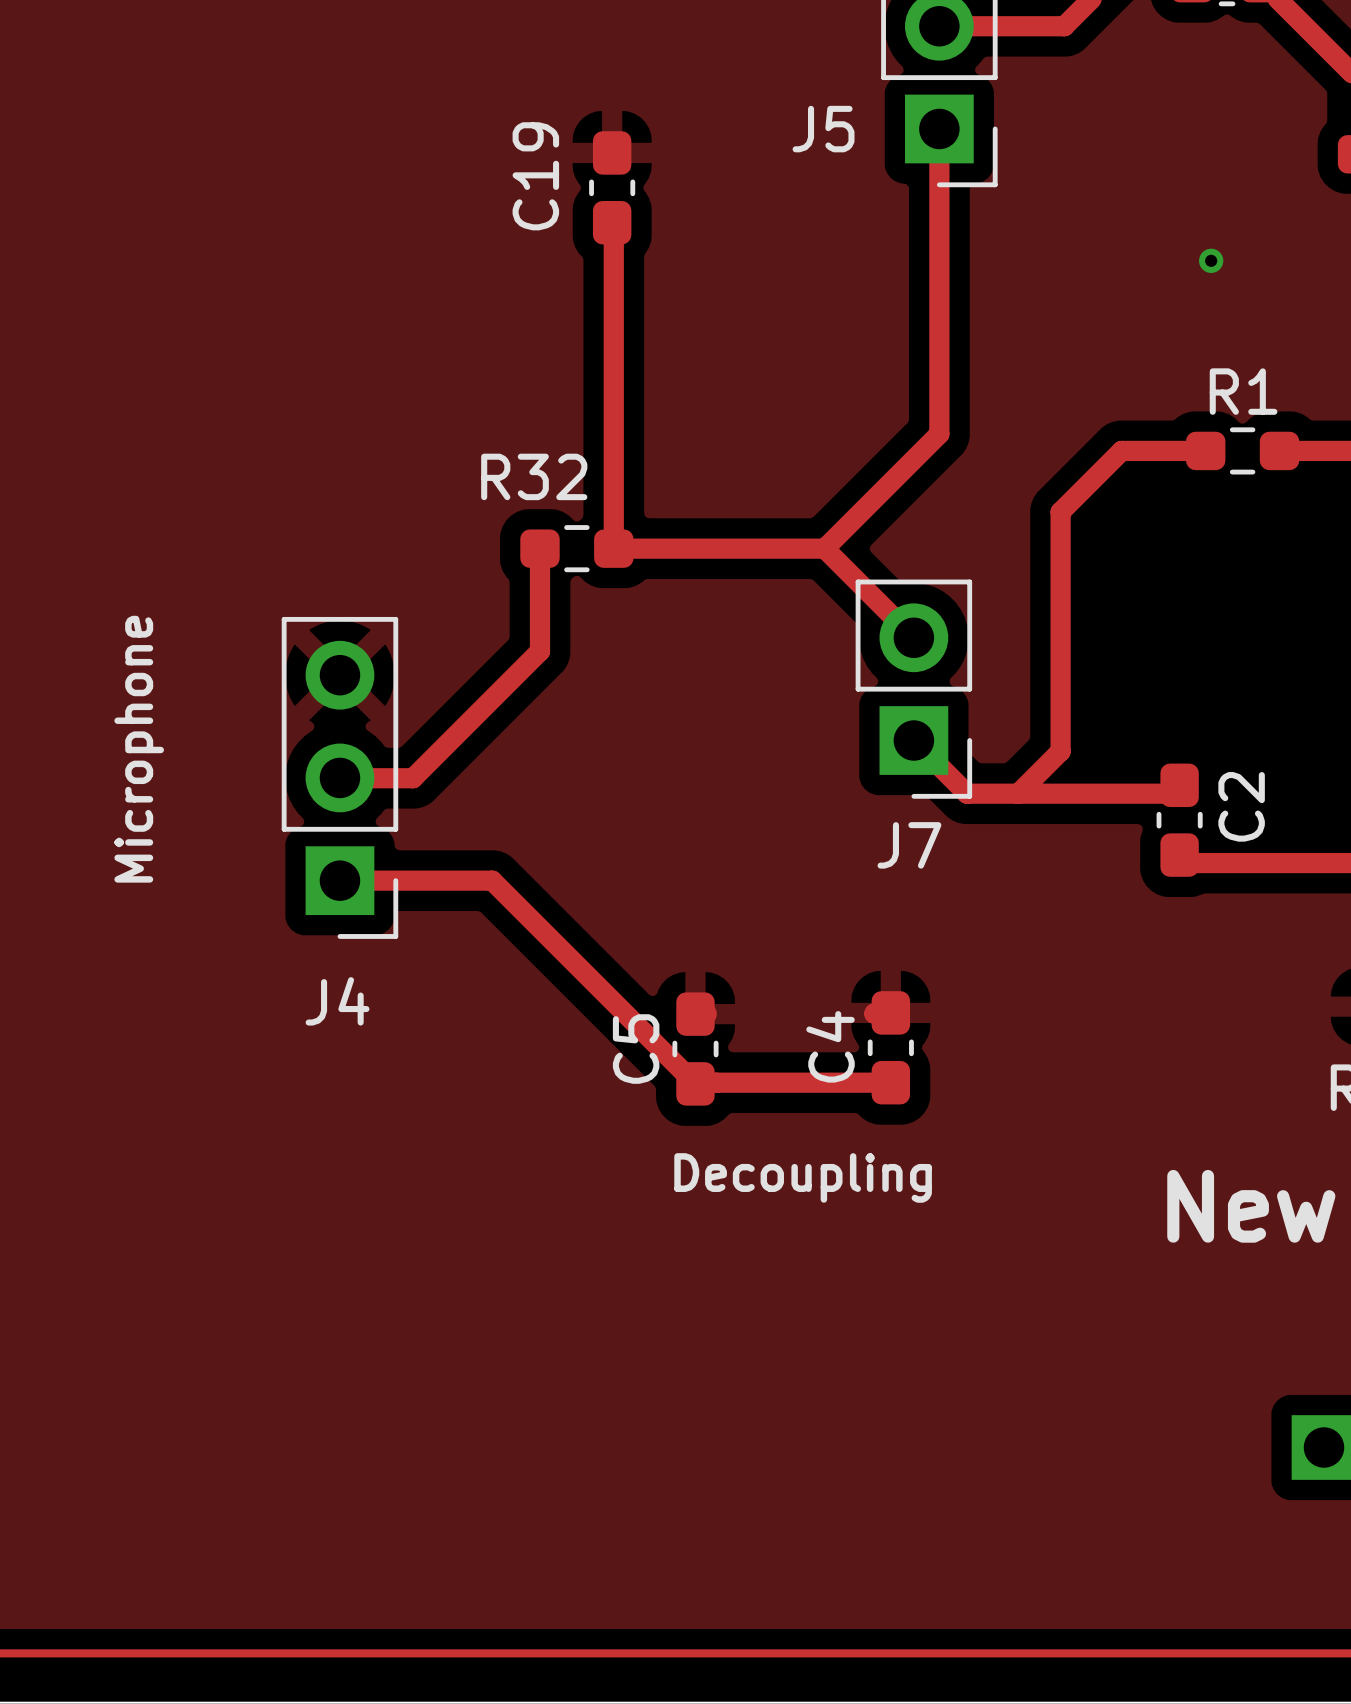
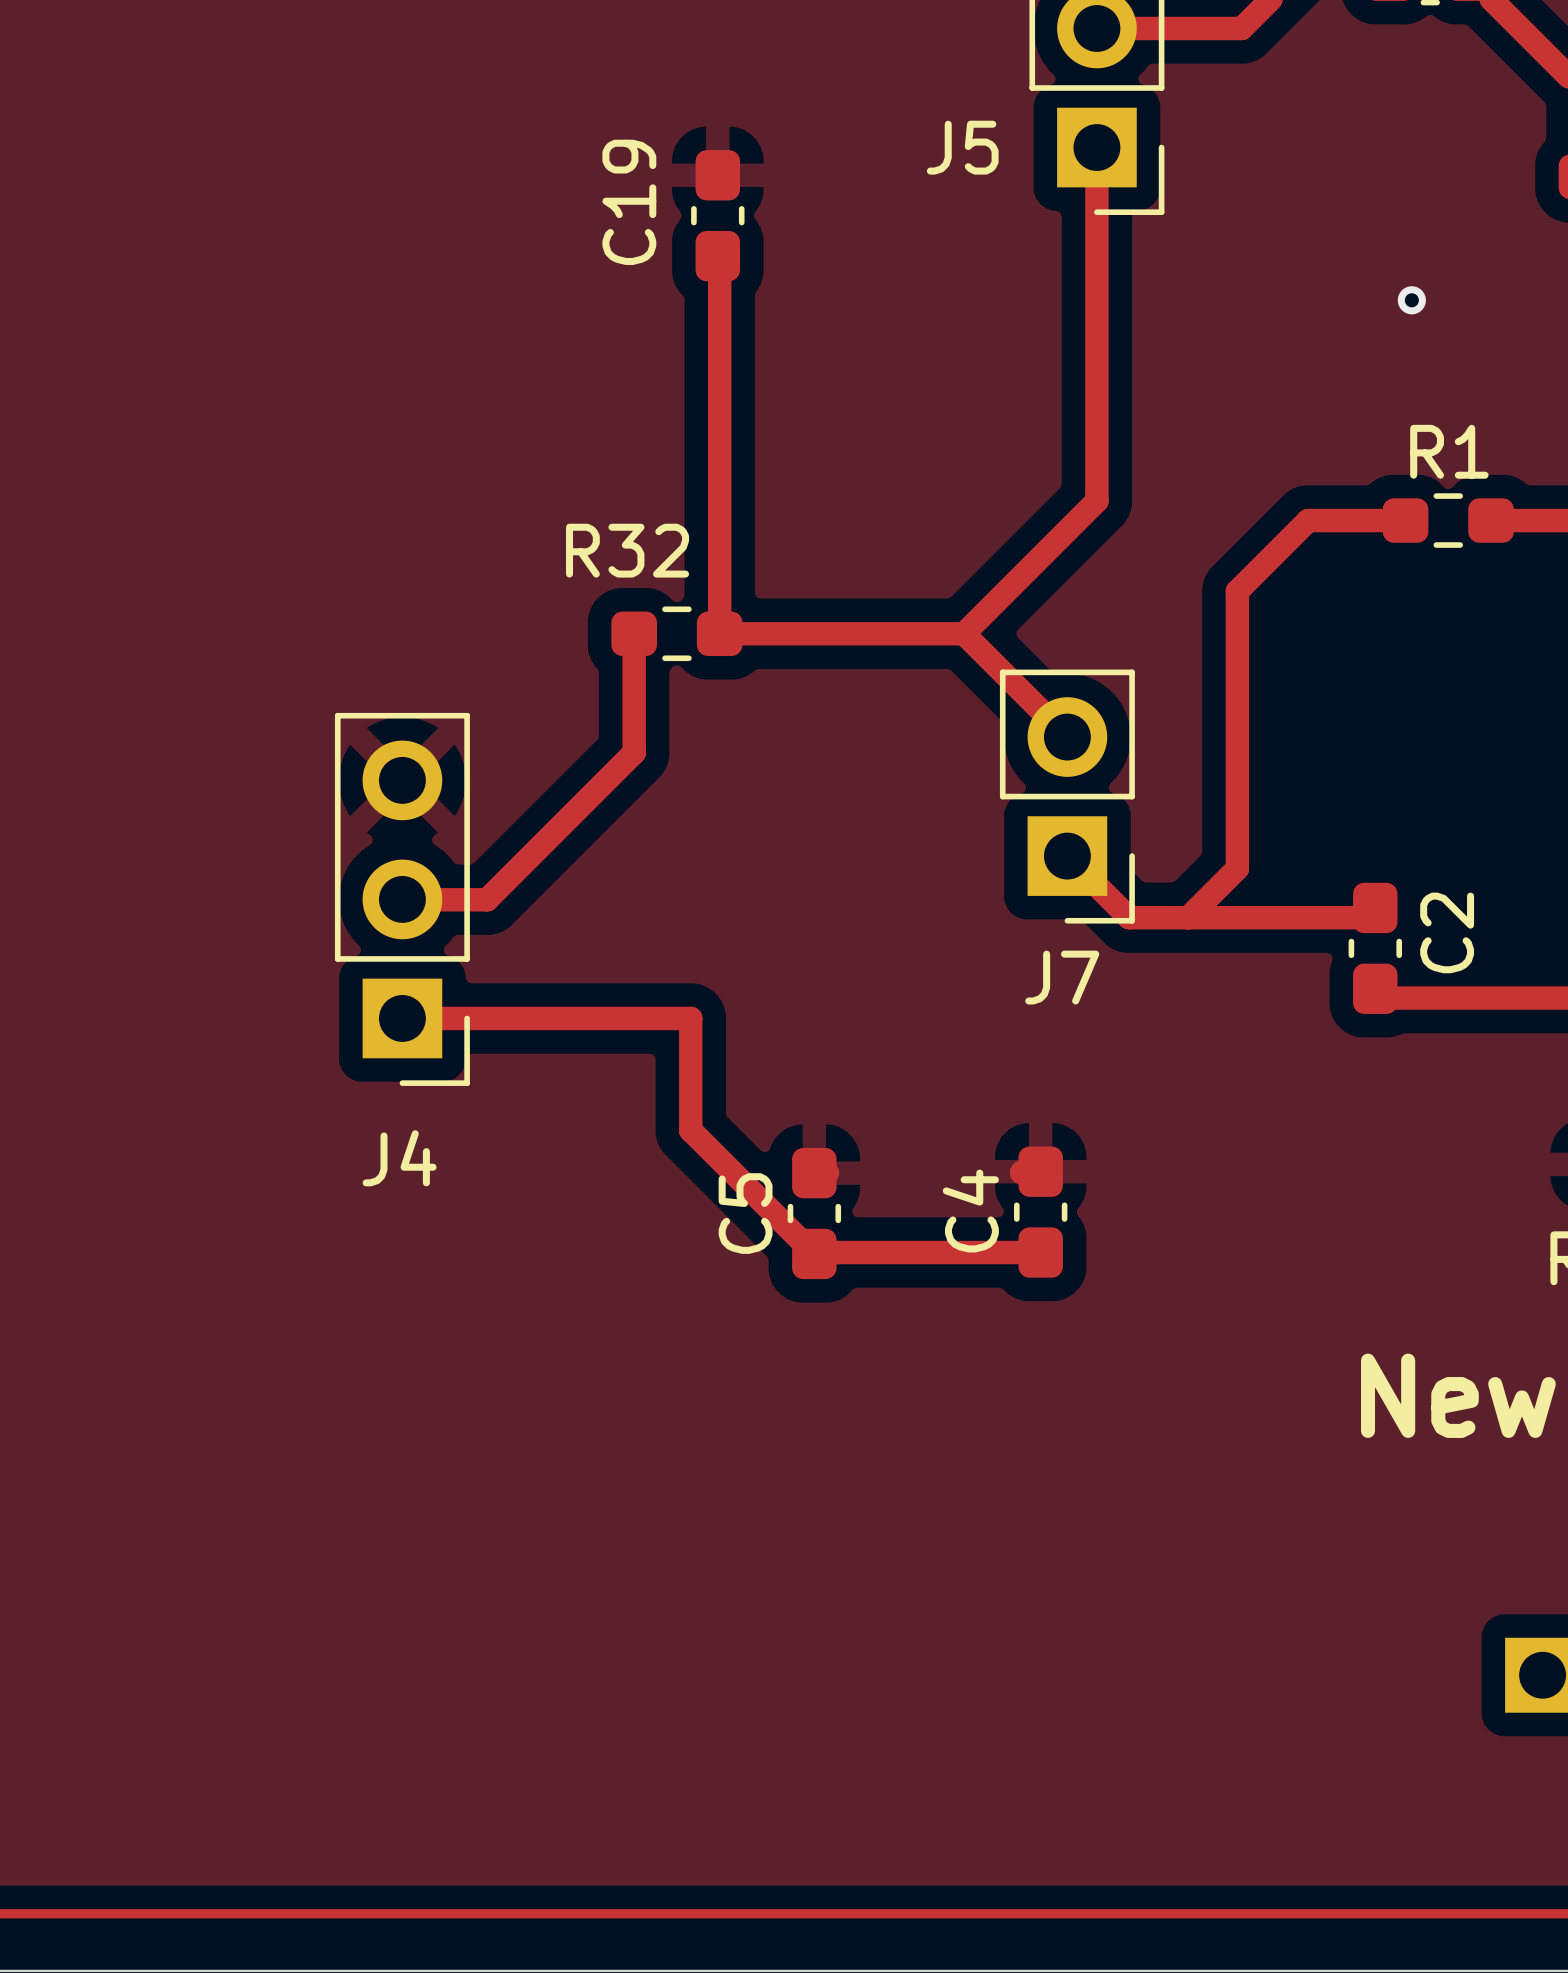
text: Microphone (139, 749) -> none
track: (492, 880) (588, 977) -> (578, 1018) (690, 1018) (690, 1130)
text: Decoupling (803, 1177) -> none

